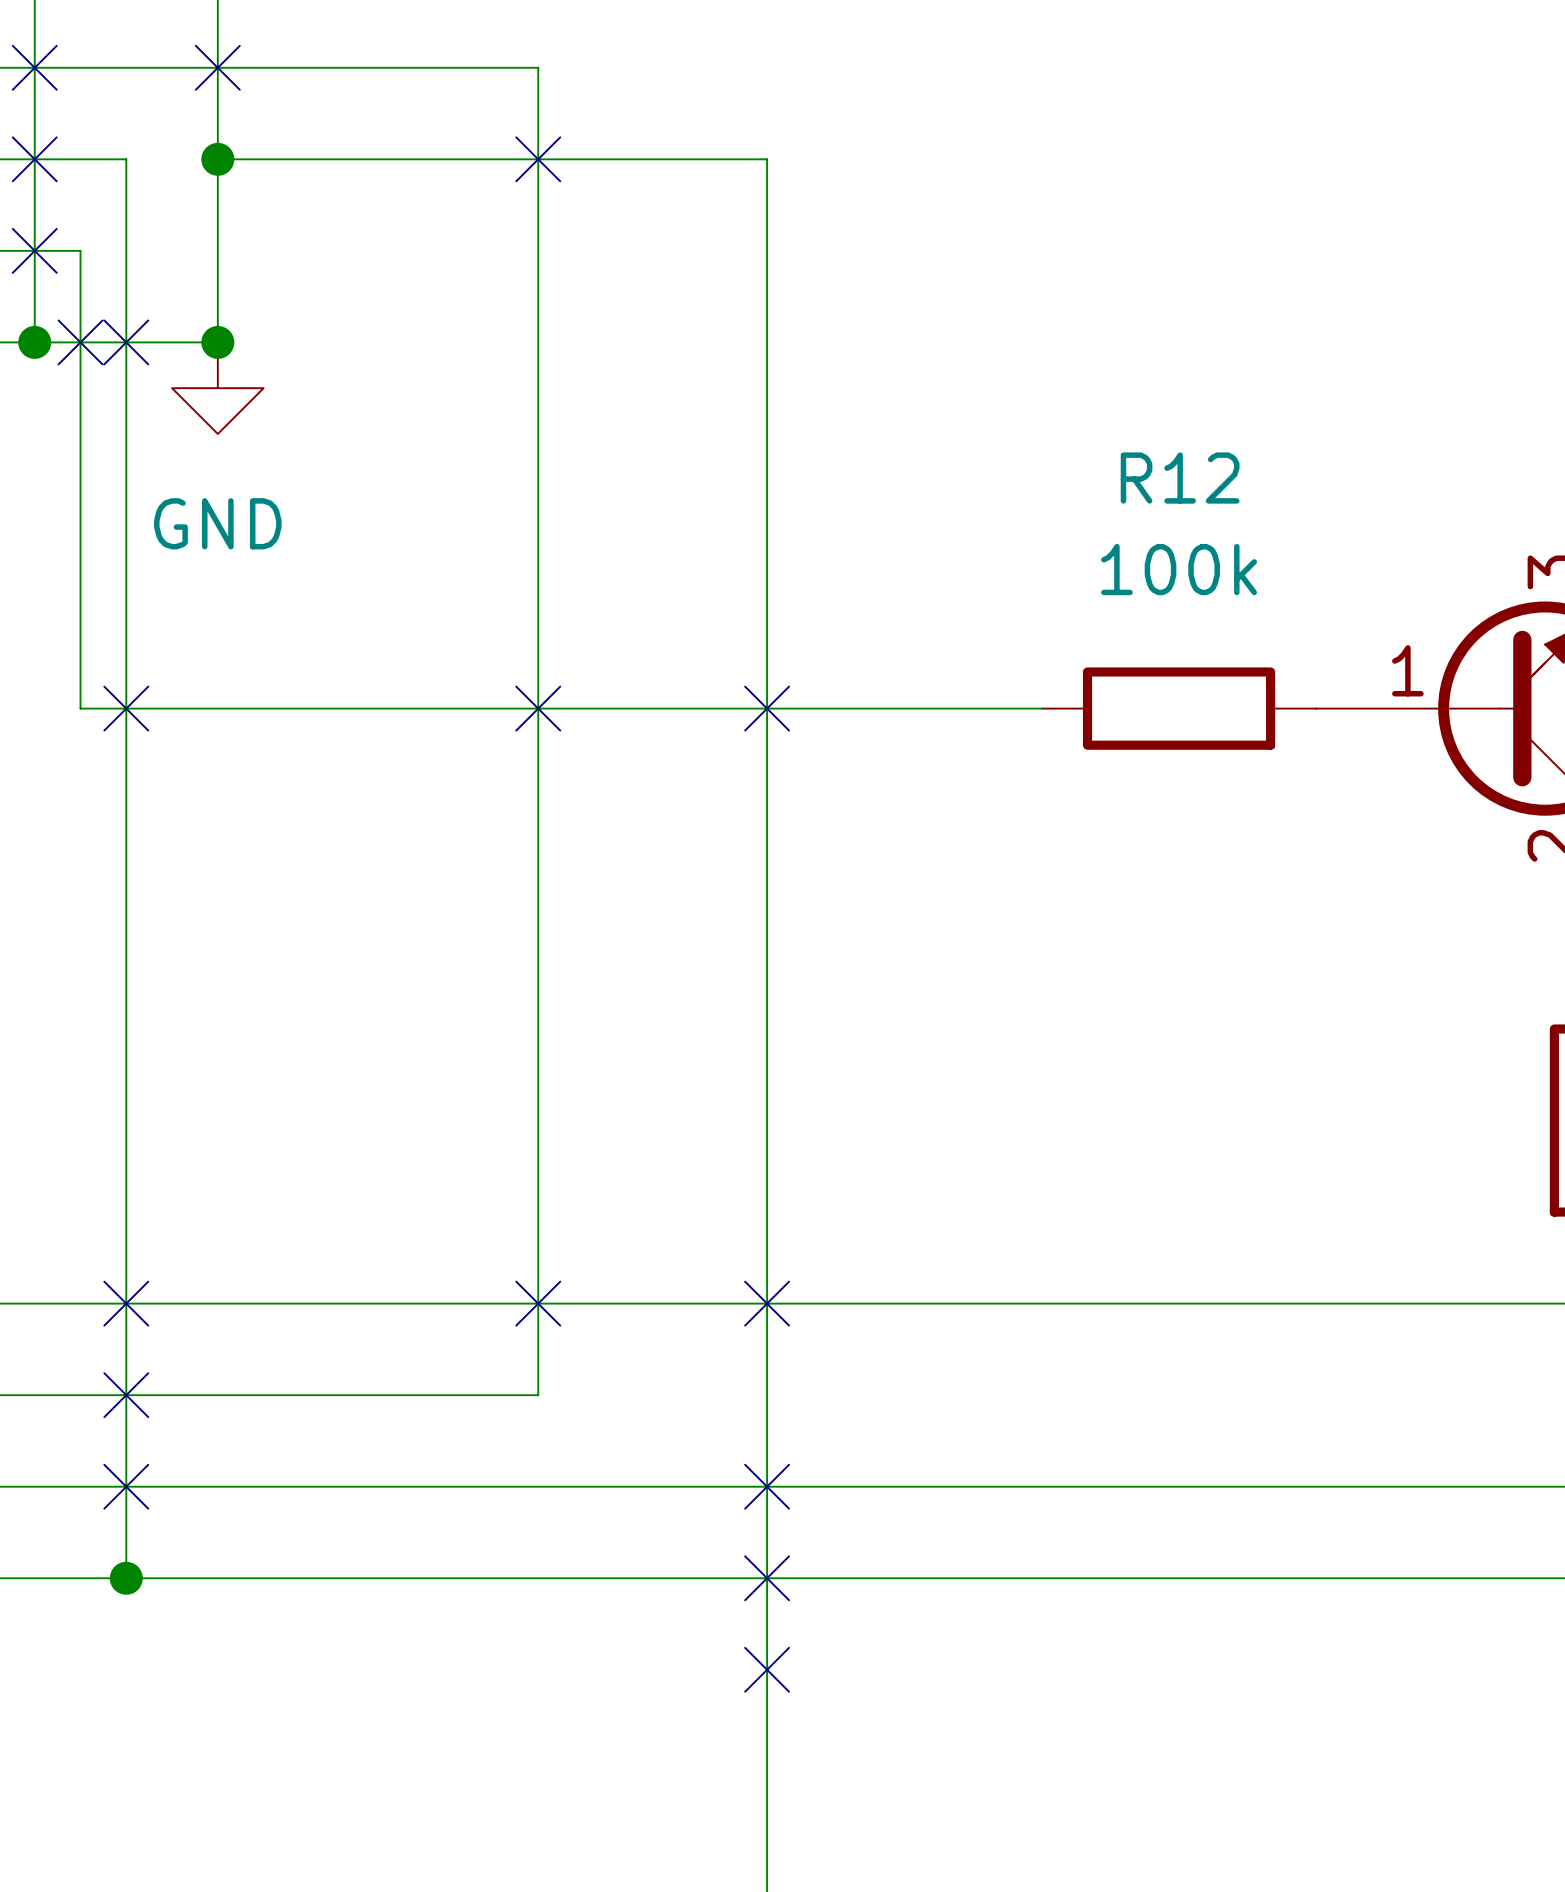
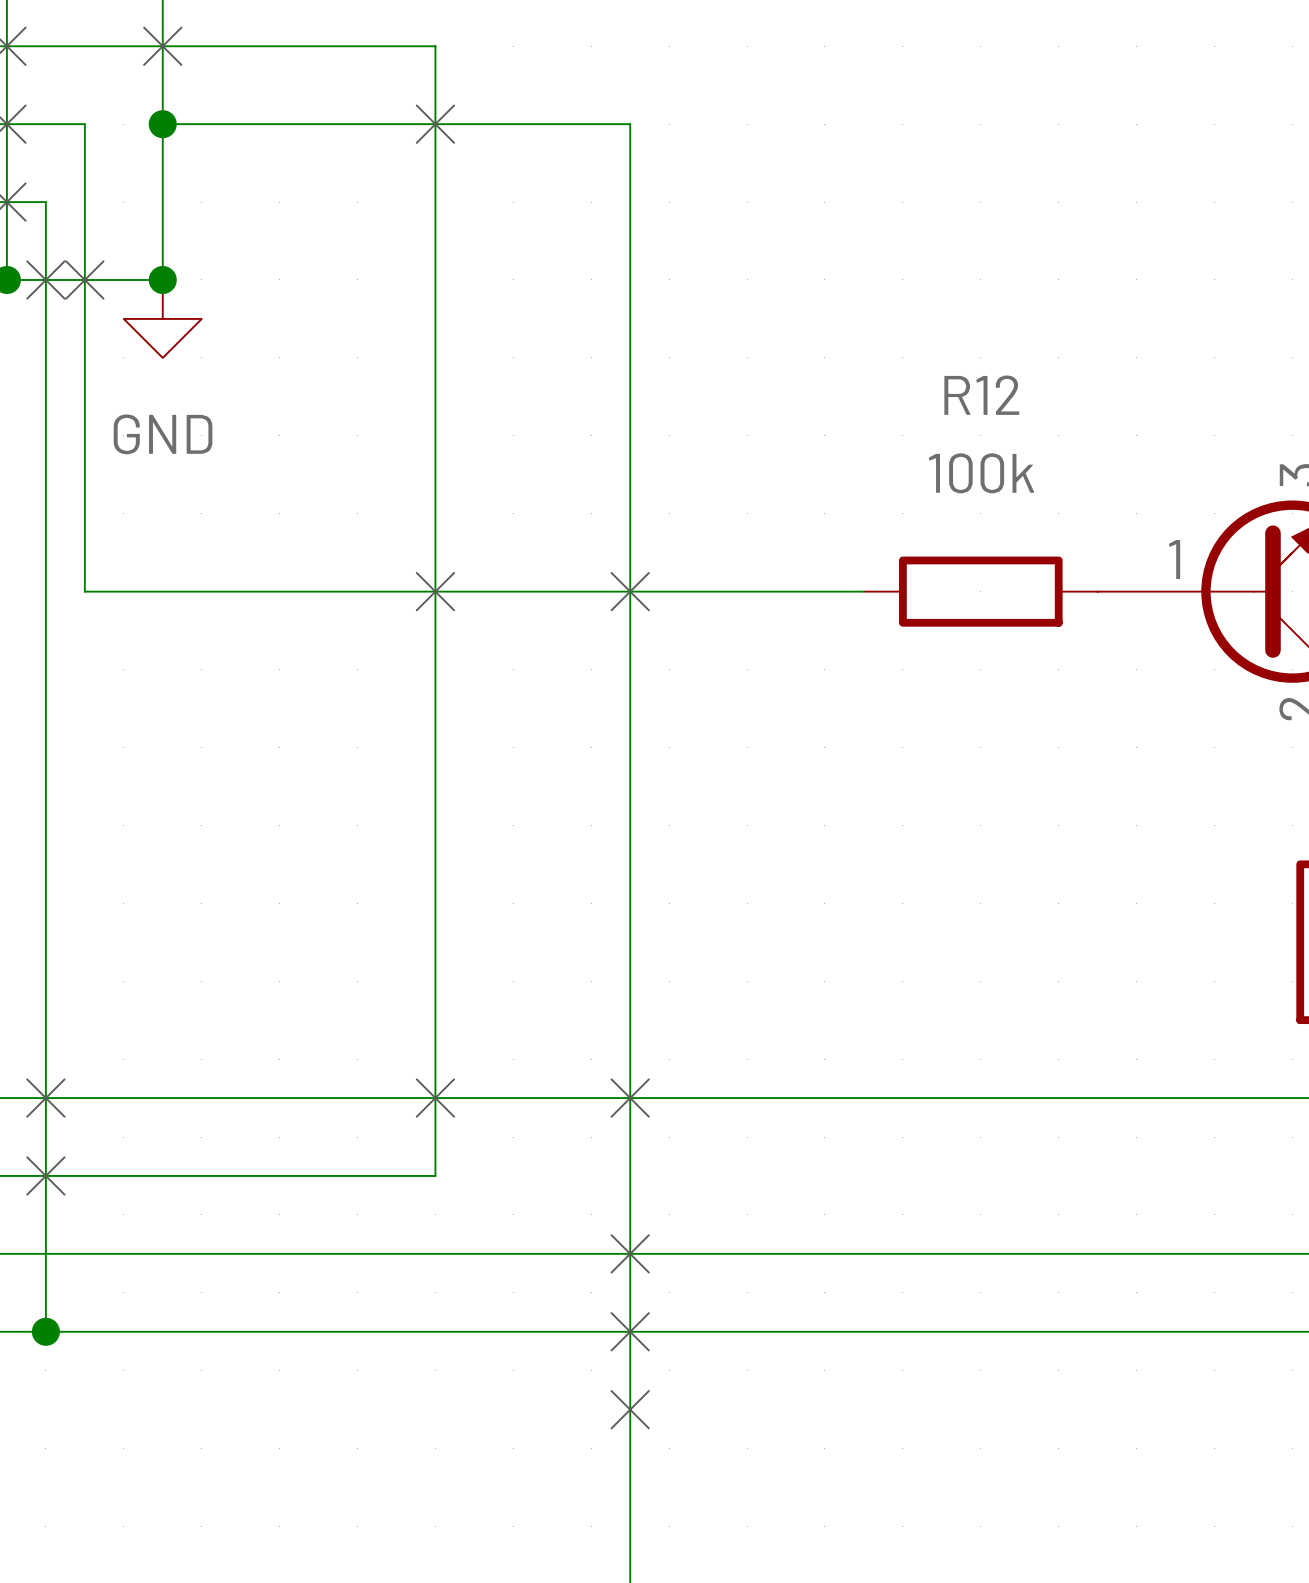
wire: (80, 708) (126, 708) (126, 1578) -> (45, 591) (45, 1331)
no-connect mark: (126, 708) -> none
no-connect mark position: (126, 1303) -> (45, 1098)
no-connect mark position: (126, 1395) -> (45, 1175)
no-connect mark: (126, 1486) -> none
junction position: (126, 1578) -> (45, 1331)

